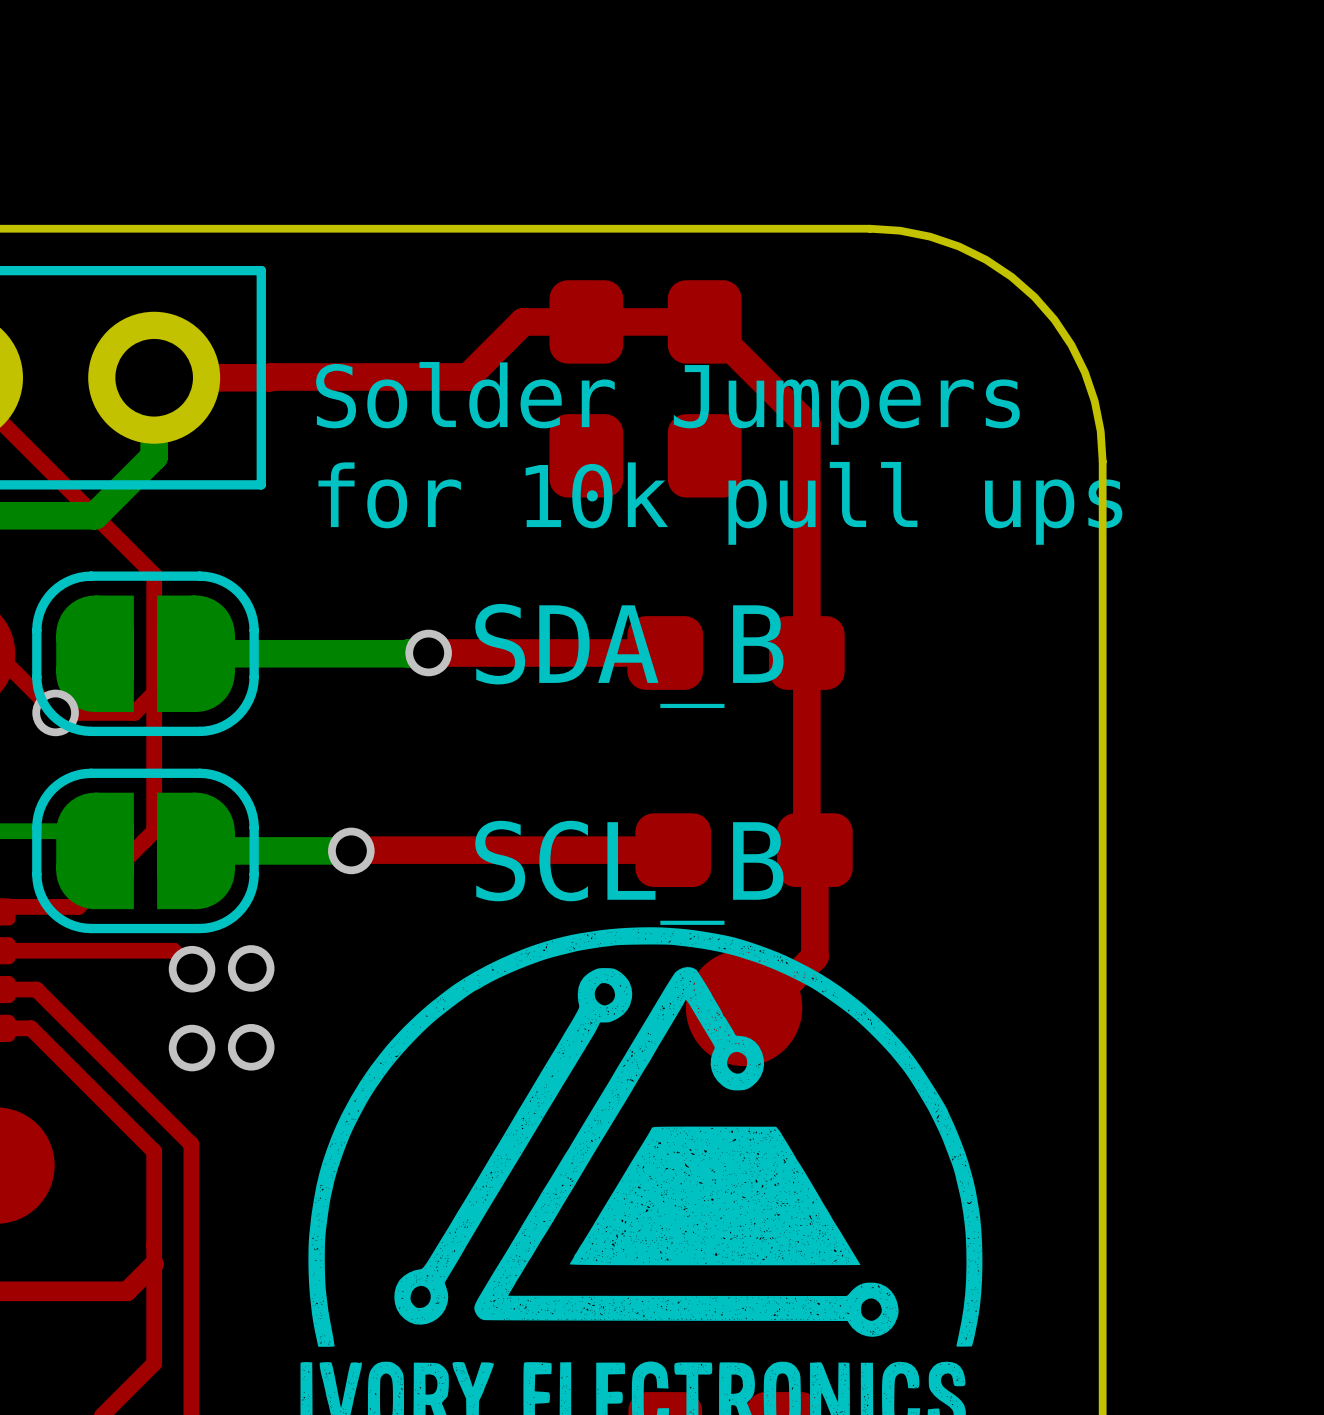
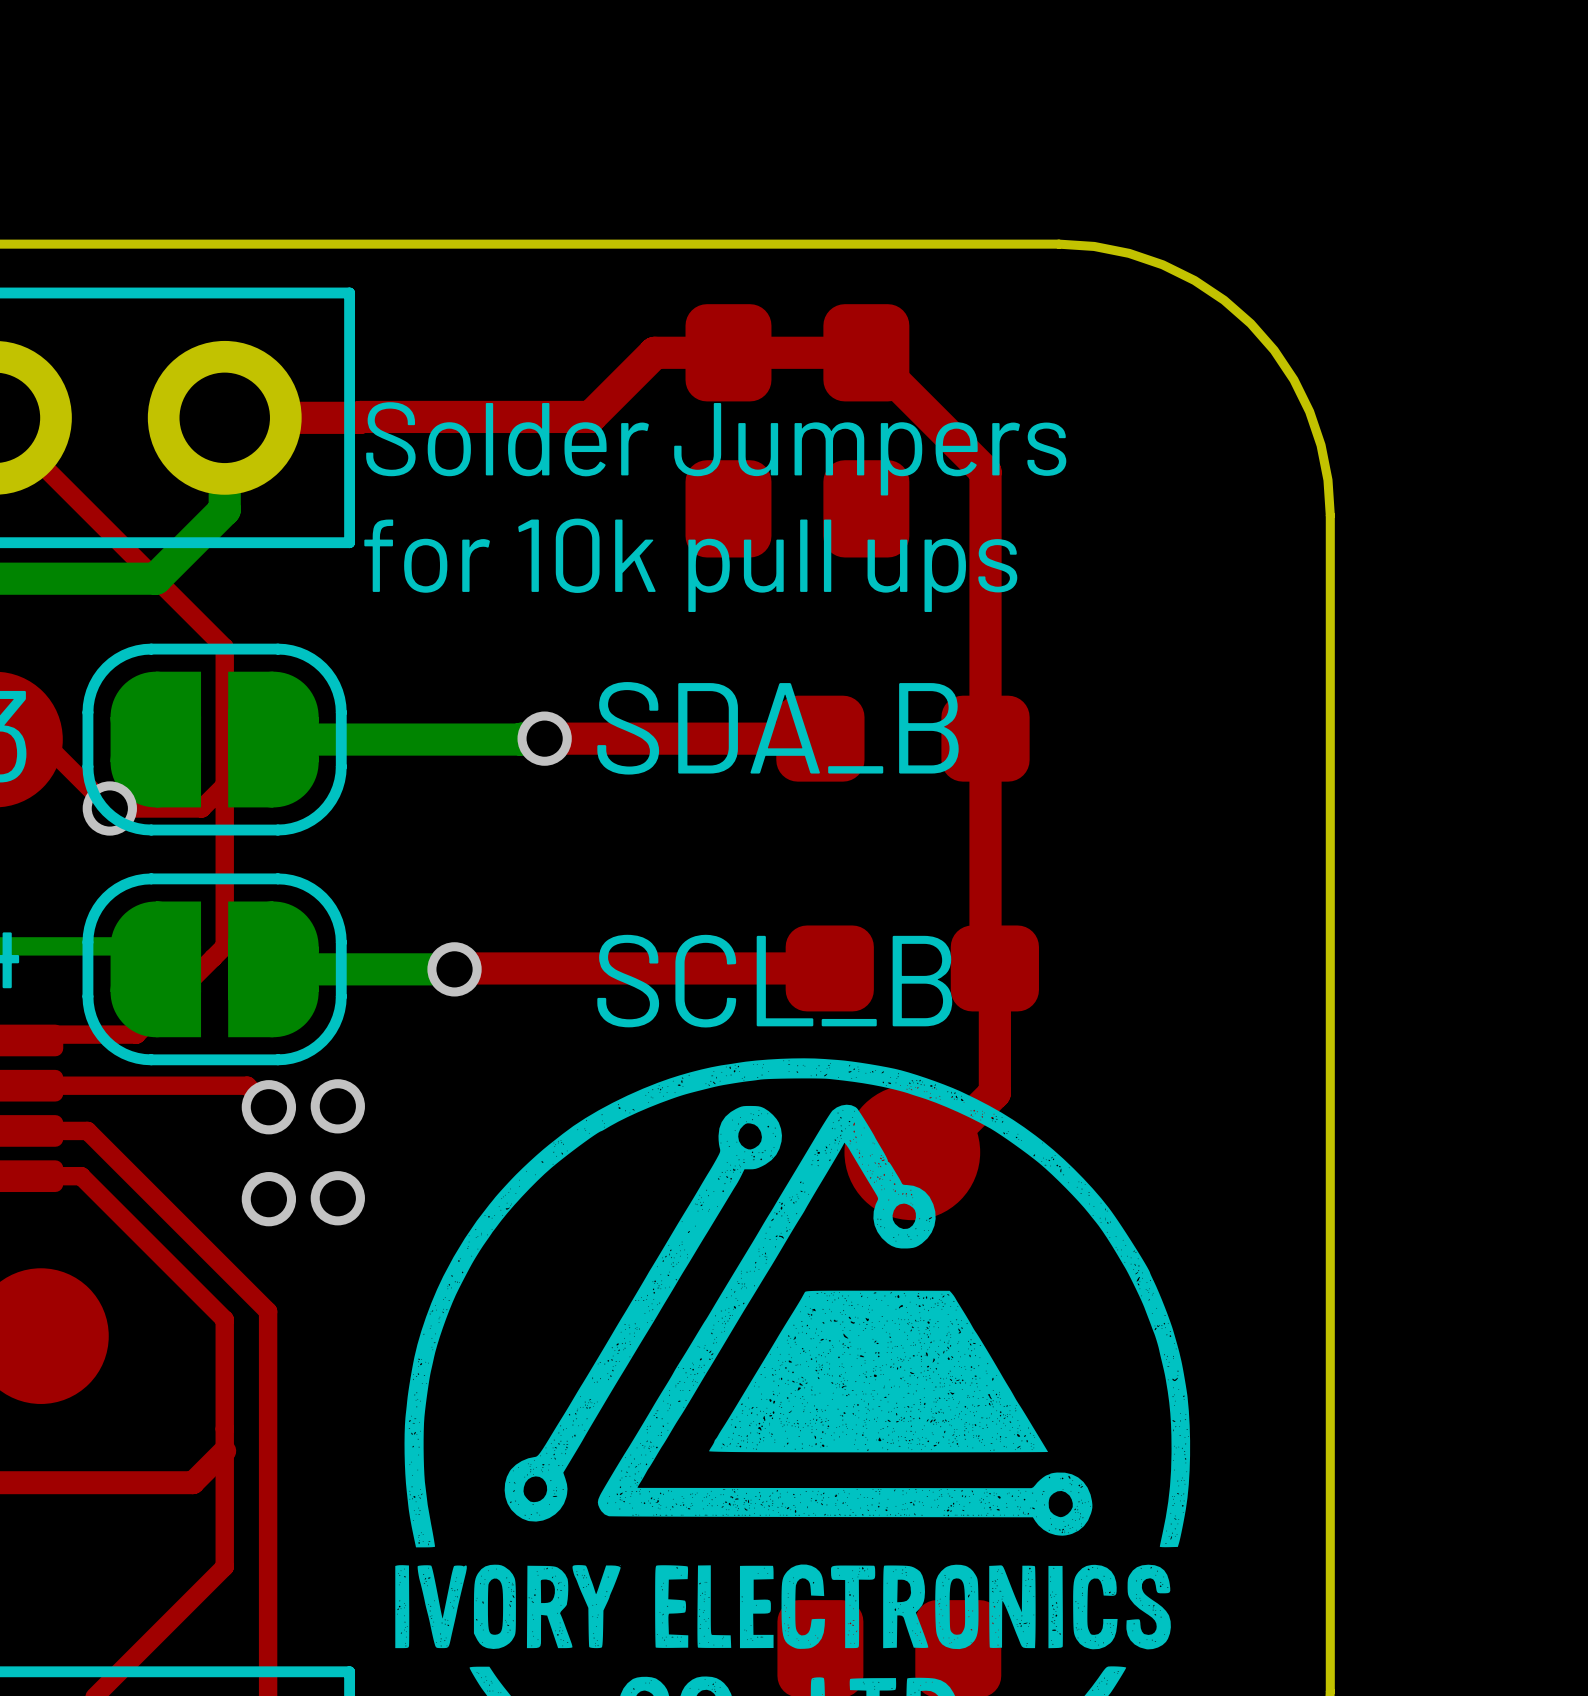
text position: Solder Jumpers (667, 403) -> Solder Jumpers (716, 448)
text position: for 10k pull ups (720, 503) -> for 10k pull ups (690, 565)

